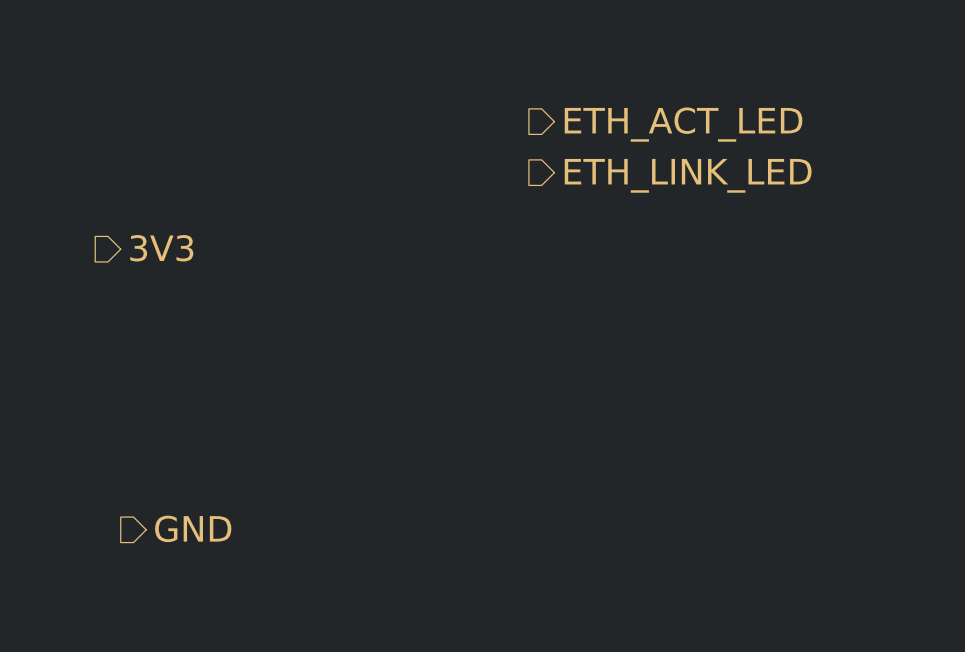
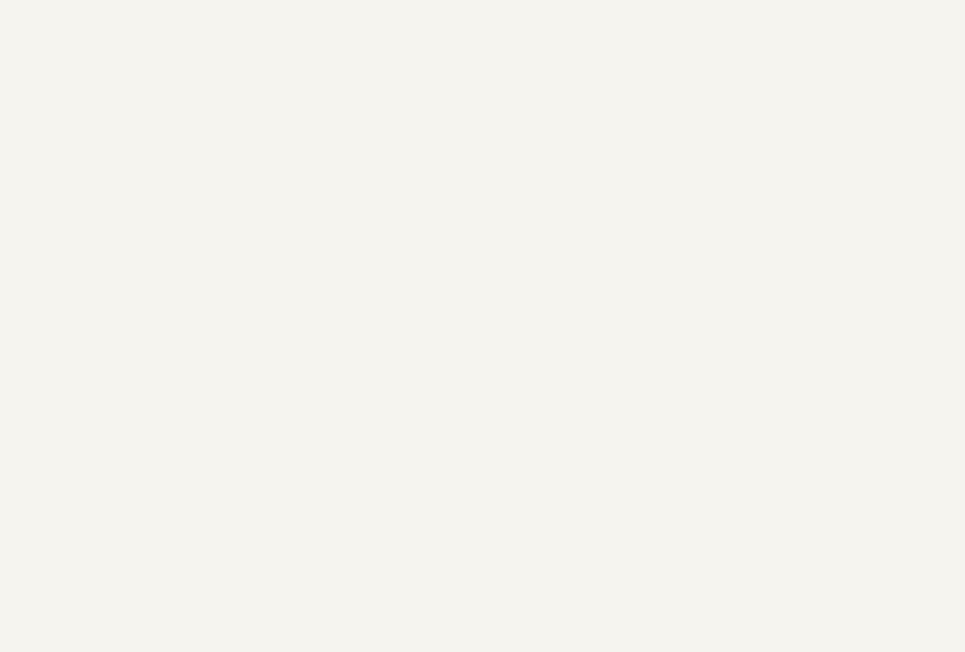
hierarchical label: ETH_ACT_LED (683, 124) -> none
hierarchical label: ETH_LINK_LED (688, 175) -> none
hierarchical label: 3V3 (161, 248) -> none
hierarchical label: GND (193, 528) -> none

